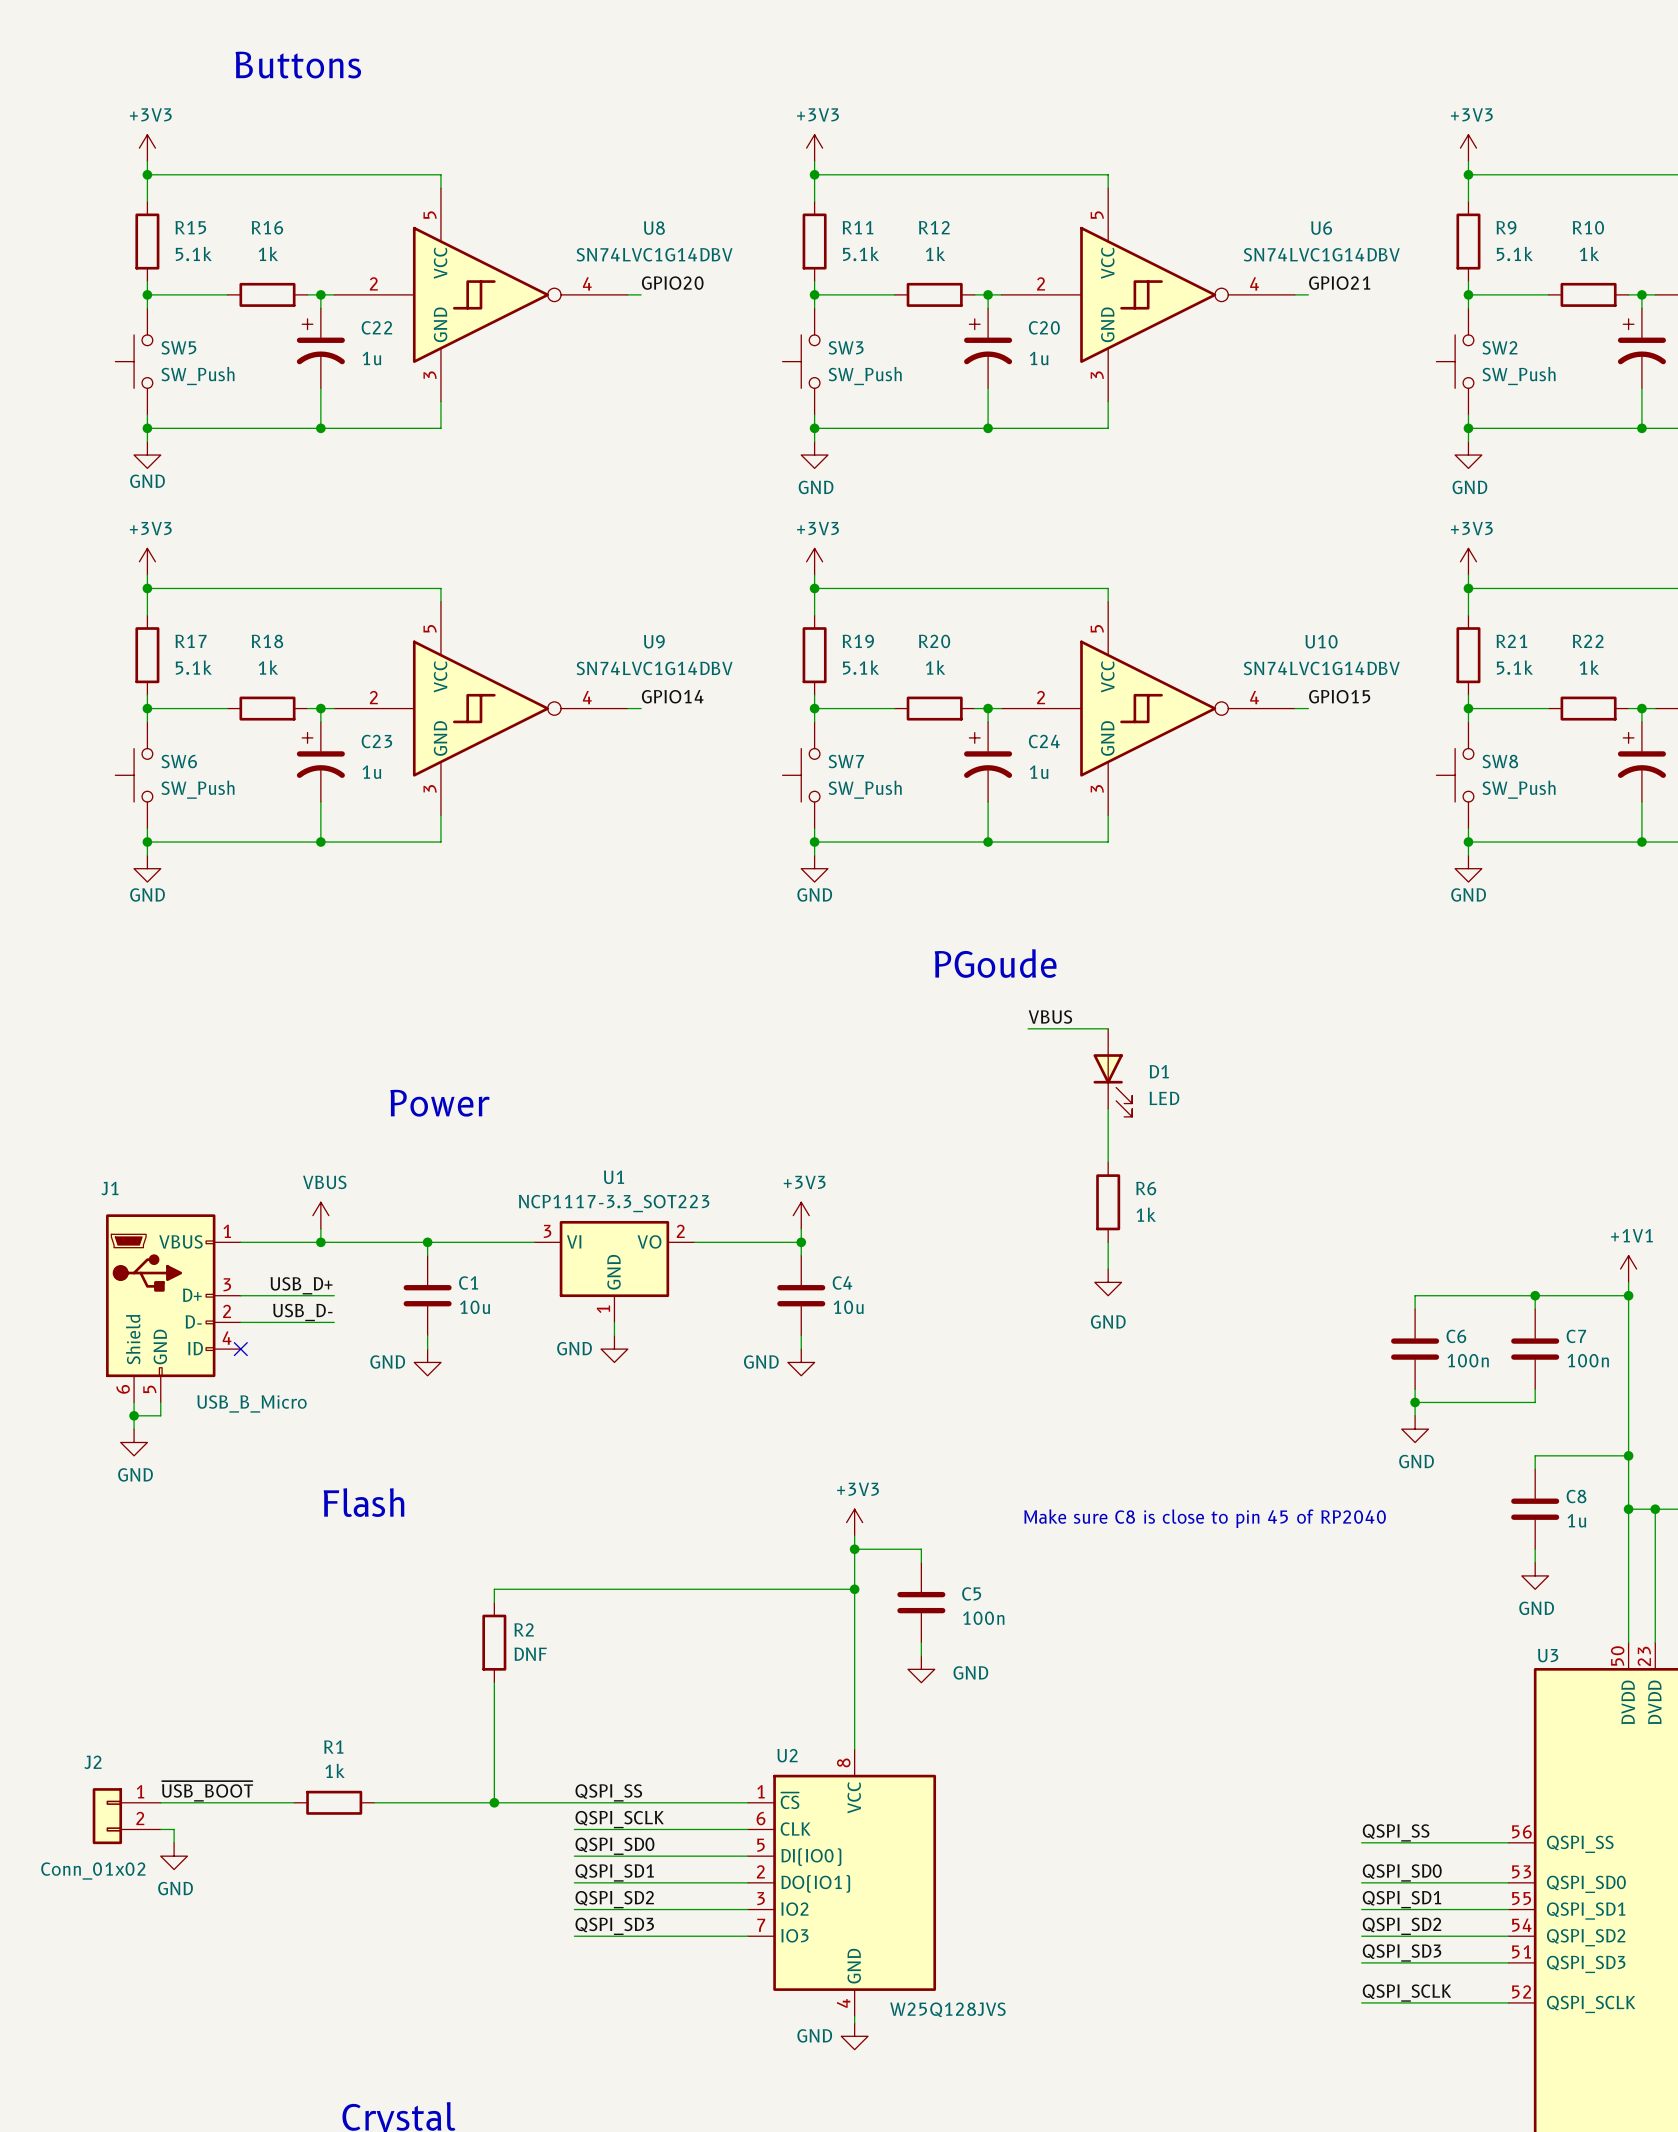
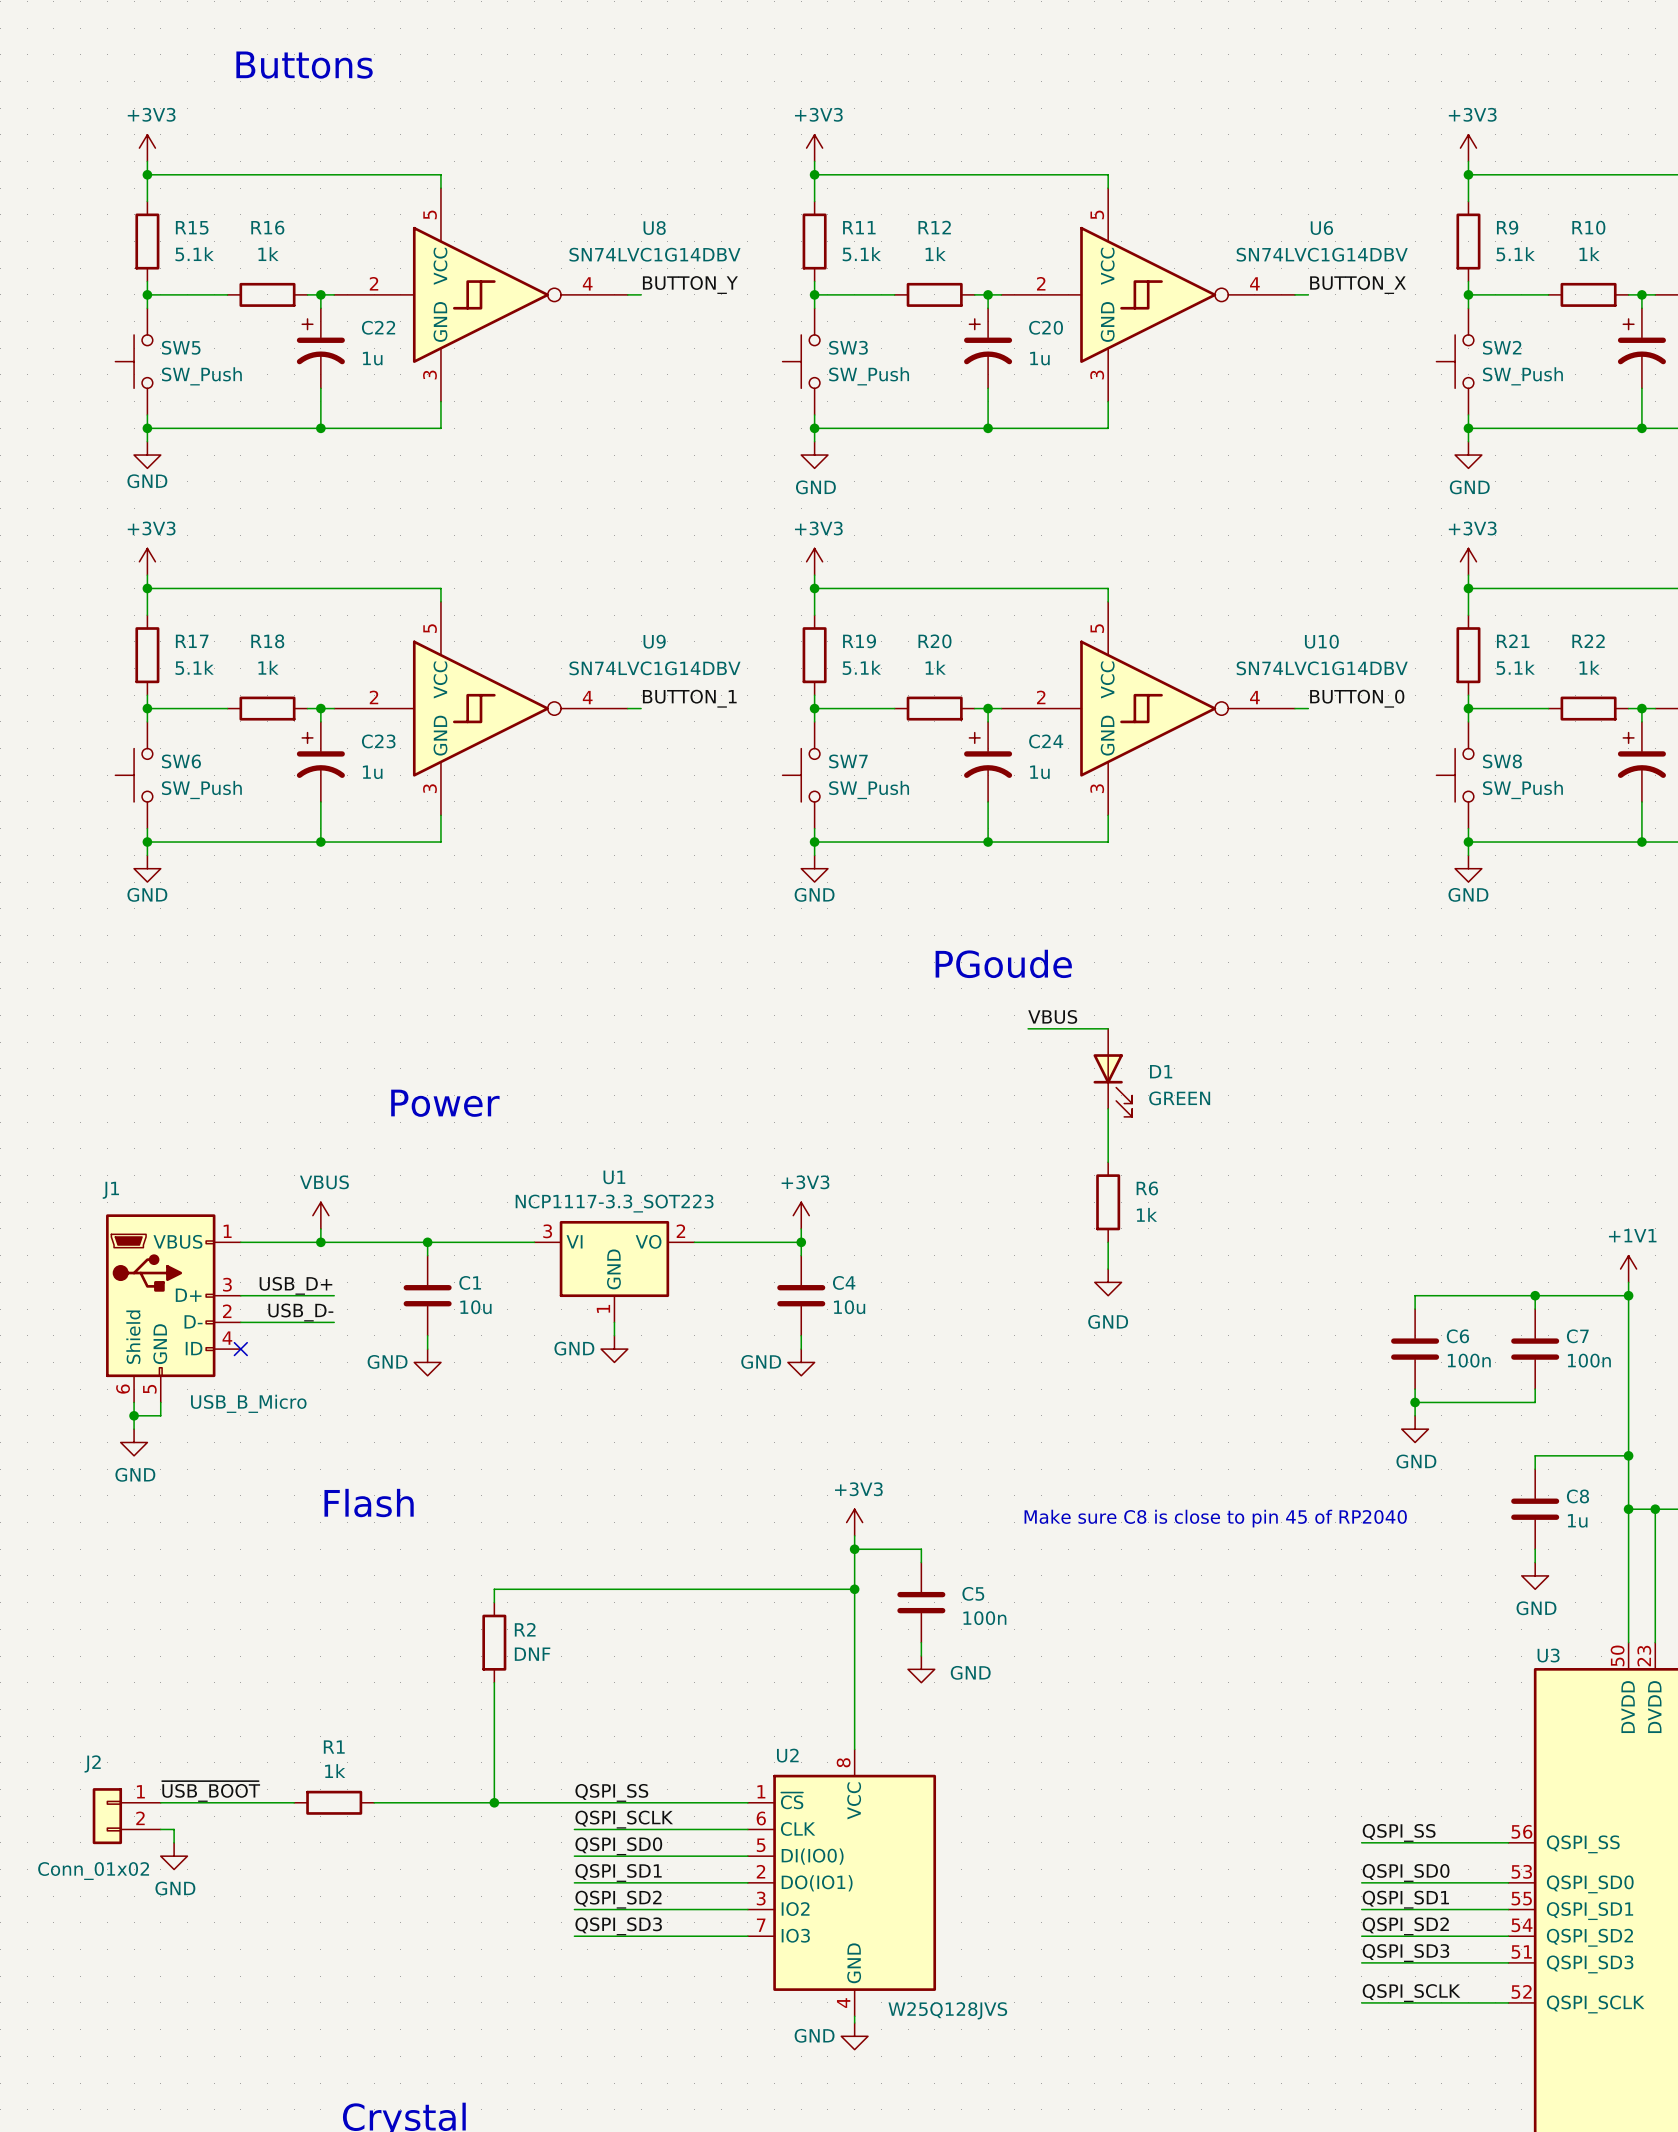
label: GPIO20 (672, 283) -> BUTTON_Y (690, 285)
label: GPIO21 (1339, 283) -> BUTTON_X (1358, 285)
label: GPIO14 (672, 696) -> BUTTON_1 (689, 698)
label: GPIO15 (1339, 696) -> BUTTON_0 (1357, 698)
D1 value: LED (1164, 1098) -> GREEN (1179, 1098)

